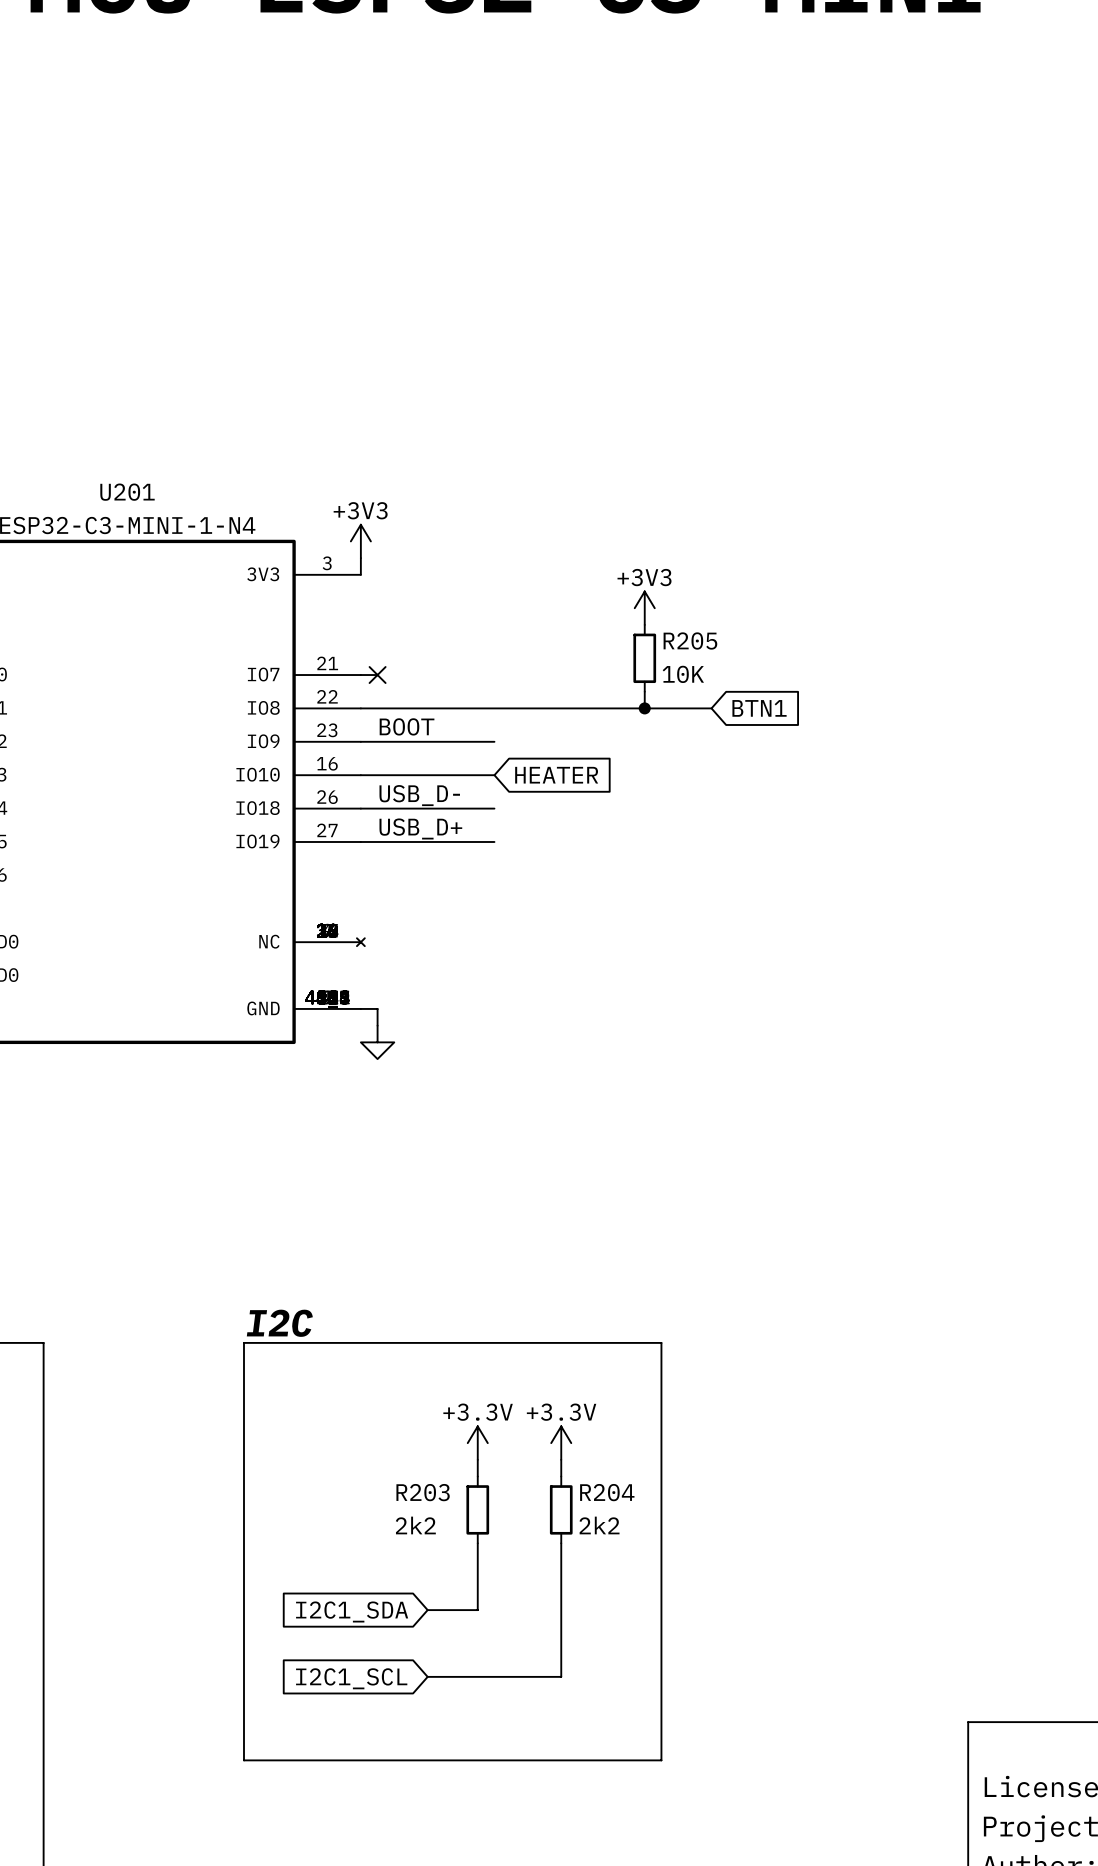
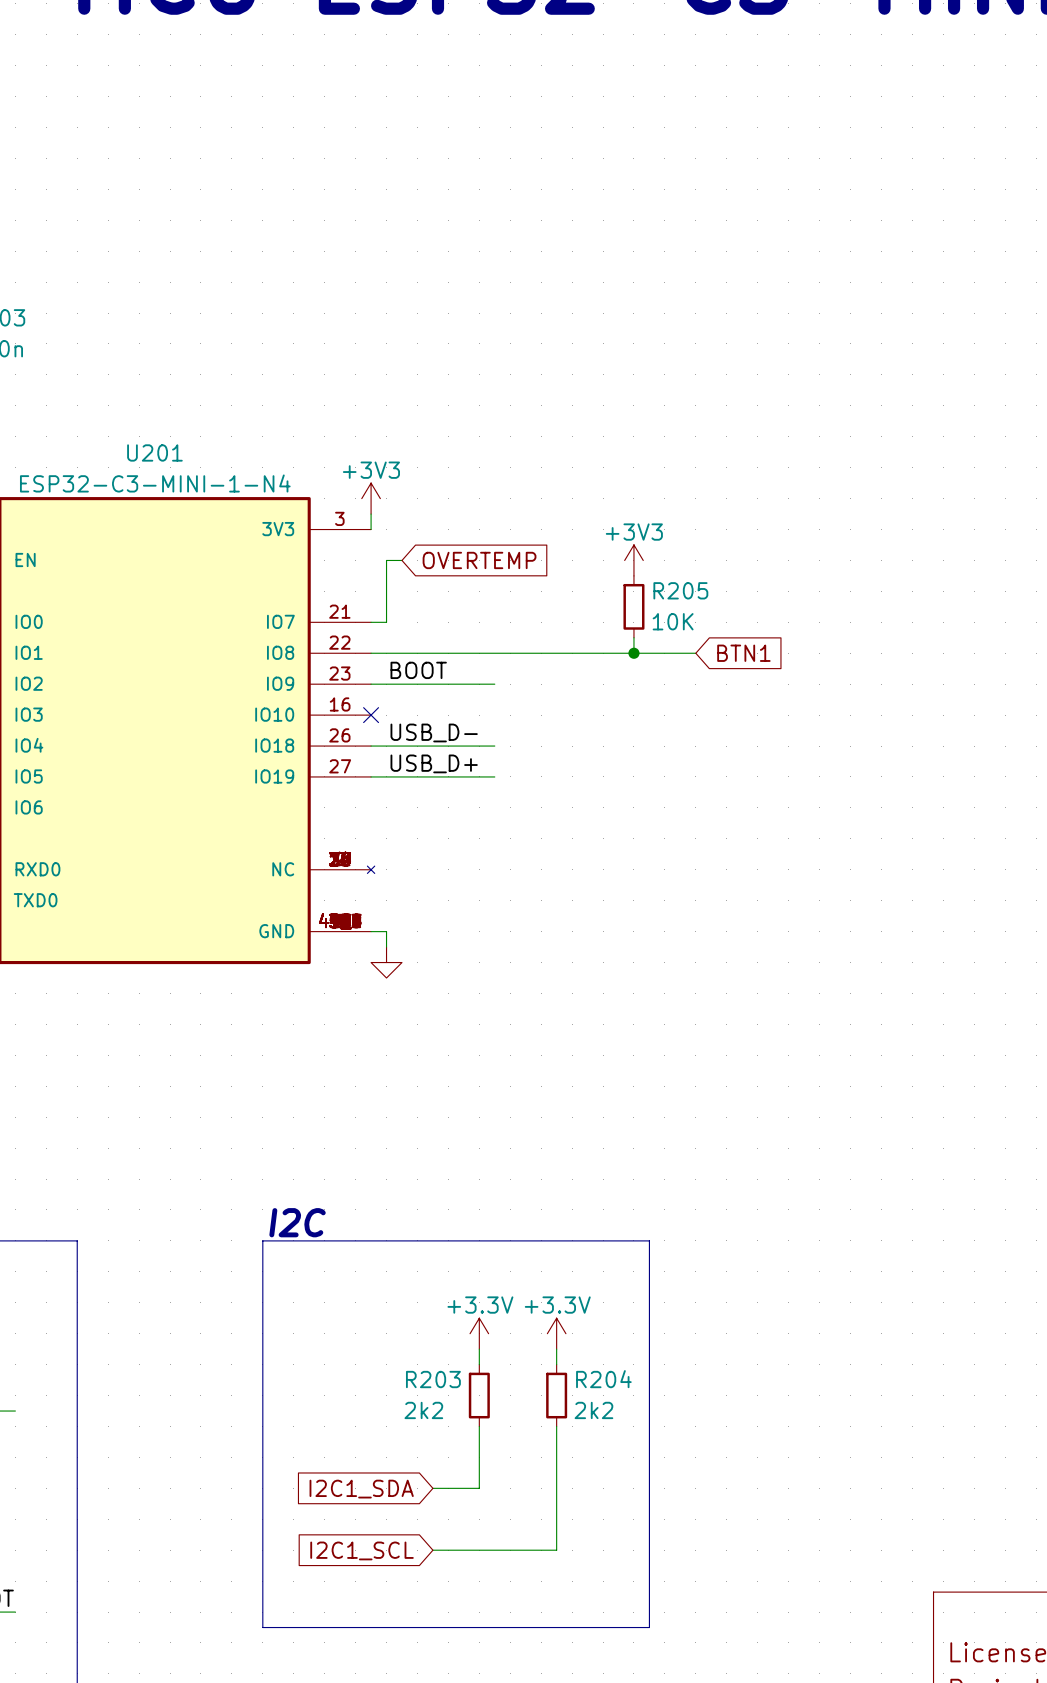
wire: none -> (402, 560) (386, 560) (386, 622)
global label: none -> OVERTEMP (479, 560)
no-connect mark: (377, 675) -> none
wire: (360, 775) (494, 775) -> none
no-connect mark: none -> (371, 715)
global label: HEATER (556, 775) -> none

